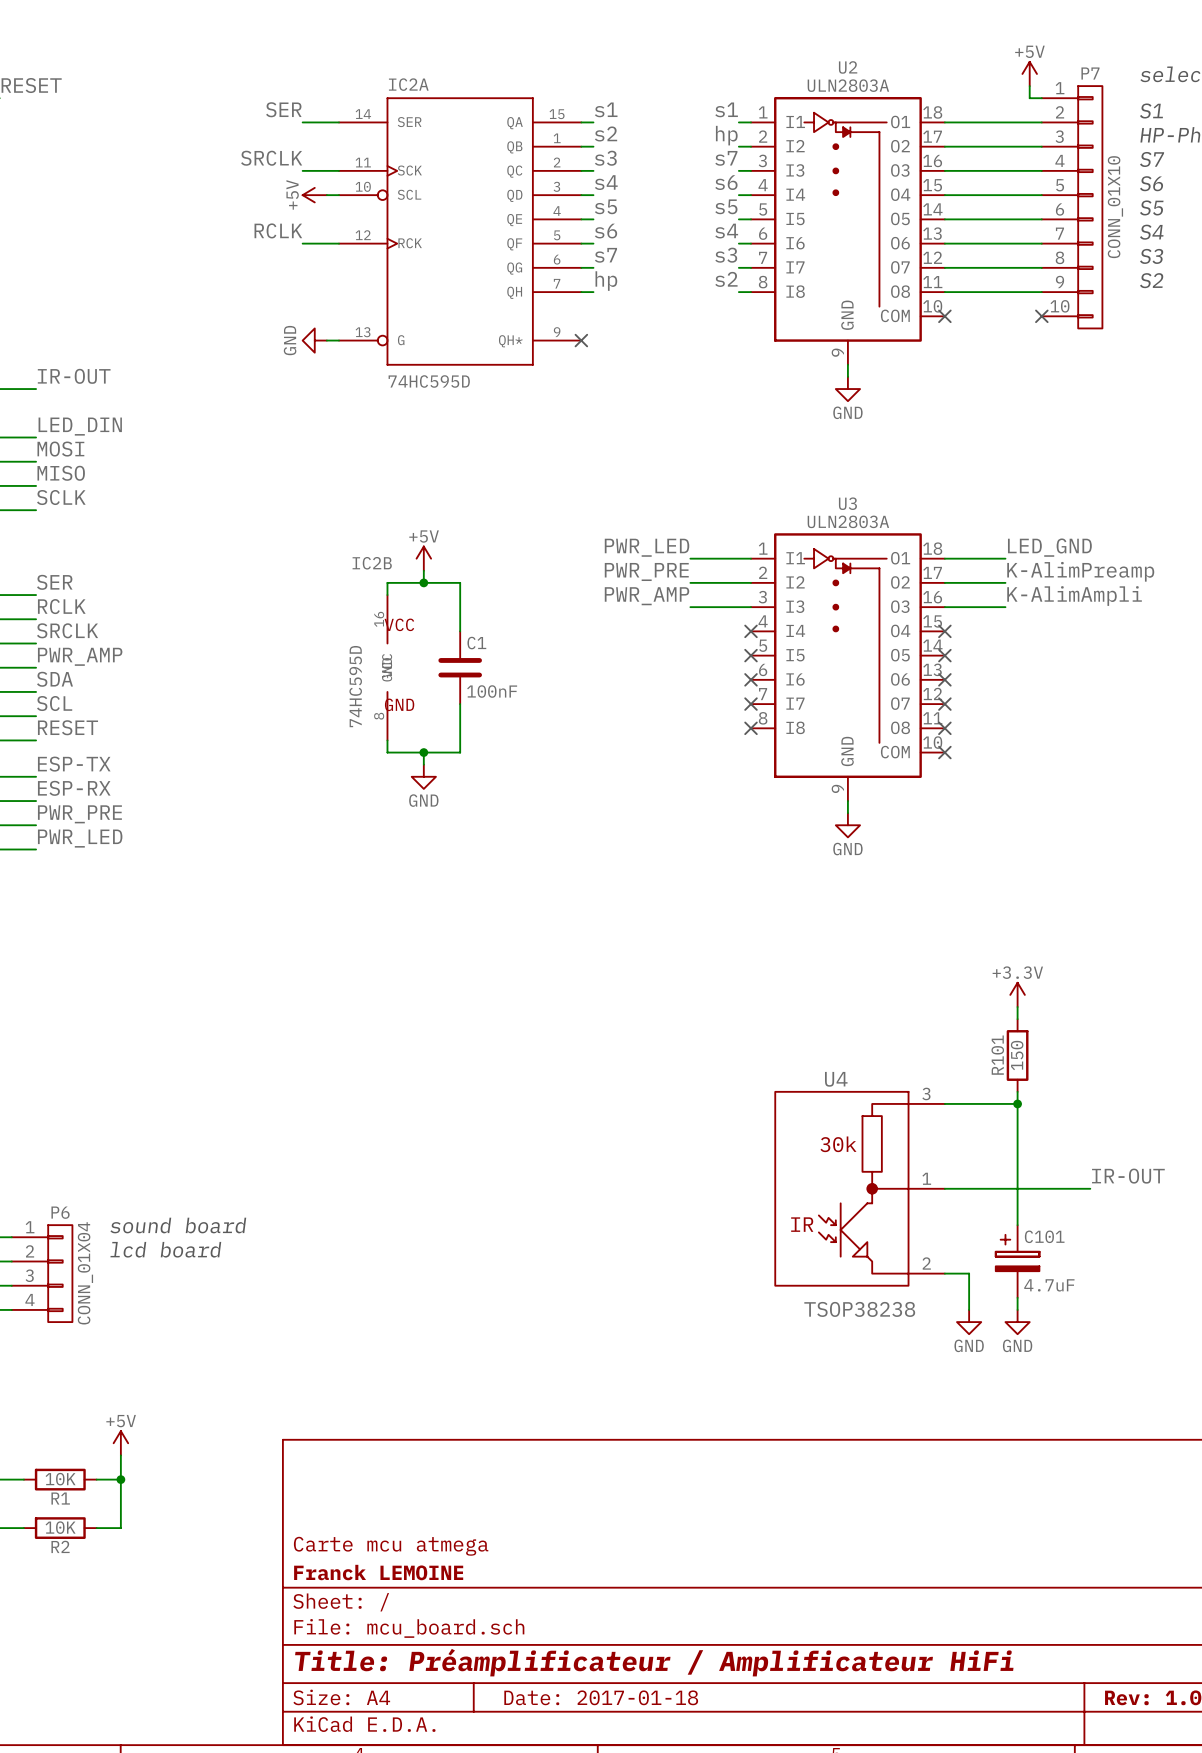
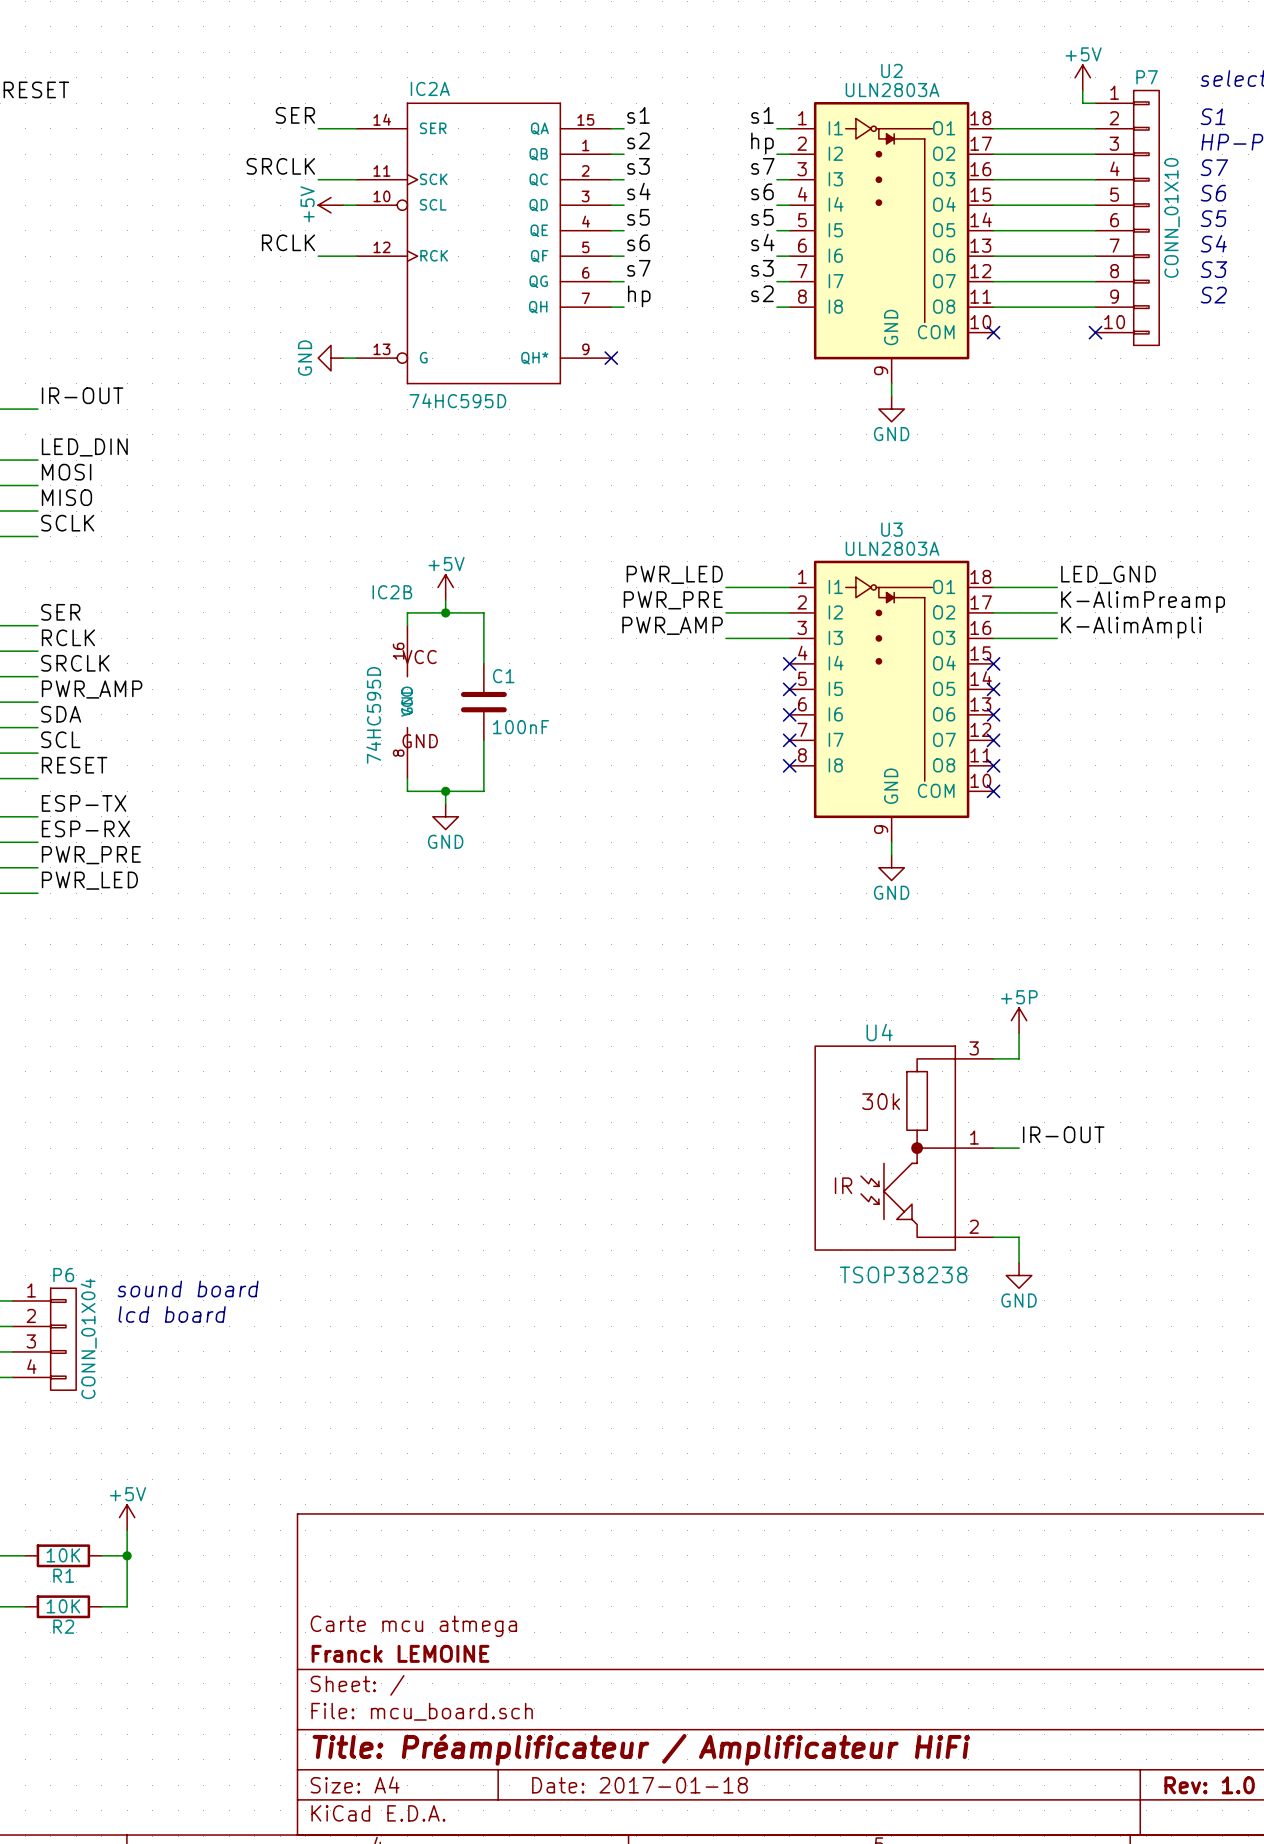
power symbol: none -> +5P (1019, 1020)
wire: none -> (1019, 1033) (1019, 1058) (993, 1058)
power symbol: +3.3V (1017, 994) -> none
wire: (1017, 1007) (1017, 1019) -> none
R101: 150 (1017, 1055) -> none
wire: none -> (993, 1148) (1019, 1148)
wire: (1017, 1091) (1017, 1225) -> none
wire: (944, 1103) (1017, 1103) -> none
junction: (1017, 1103) -> none
wire: none -> (993, 1237) (1019, 1237) (1019, 1262)
label position: IR-OUT (1128, 1176) -> IR-OUT (1063, 1134)
U4 position: (860, 1188) -> (904, 1148)
wire: (944, 1188) (1090, 1188) -> none
power symbol: none -> GND (1019, 1275)
C101: 4.7uF (1017, 1261) -> none
wire: (944, 1273) (969, 1273) (969, 1309) -> none
wire: (1017, 1297) (1017, 1309) -> none
power symbol: GND (969, 1322) -> none
power symbol: GND (1017, 1322) -> none

